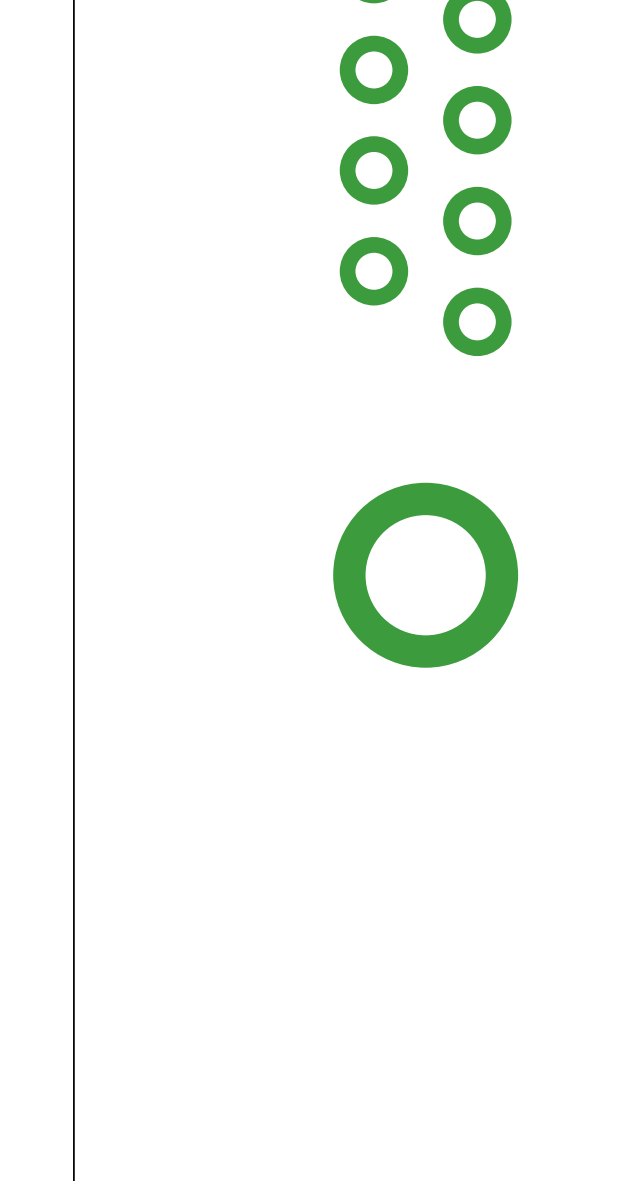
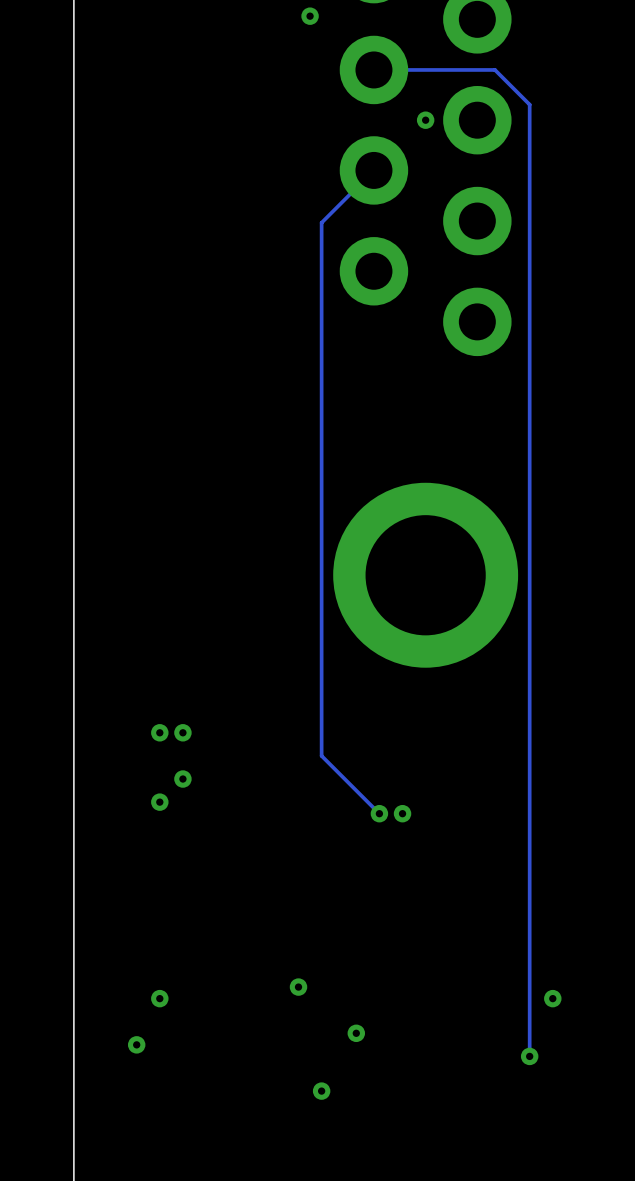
via: none -> (310, 16)
track: none -> (373, 69) (495, 69) (529, 104) (529, 1056)
via: none -> (425, 120)
track: none -> (373, 170) (321, 222) (321, 755) (379, 813)
via: none -> (159, 732)
via: none -> (182, 732)
via: none -> (182, 779)
via: none -> (159, 802)
via: none -> (379, 813)
via: none -> (402, 813)
via: none -> (298, 987)
via: none -> (159, 998)
via: none -> (552, 998)
via: none -> (356, 1033)
via: none -> (136, 1044)
via: none -> (529, 1056)
via: none -> (321, 1091)

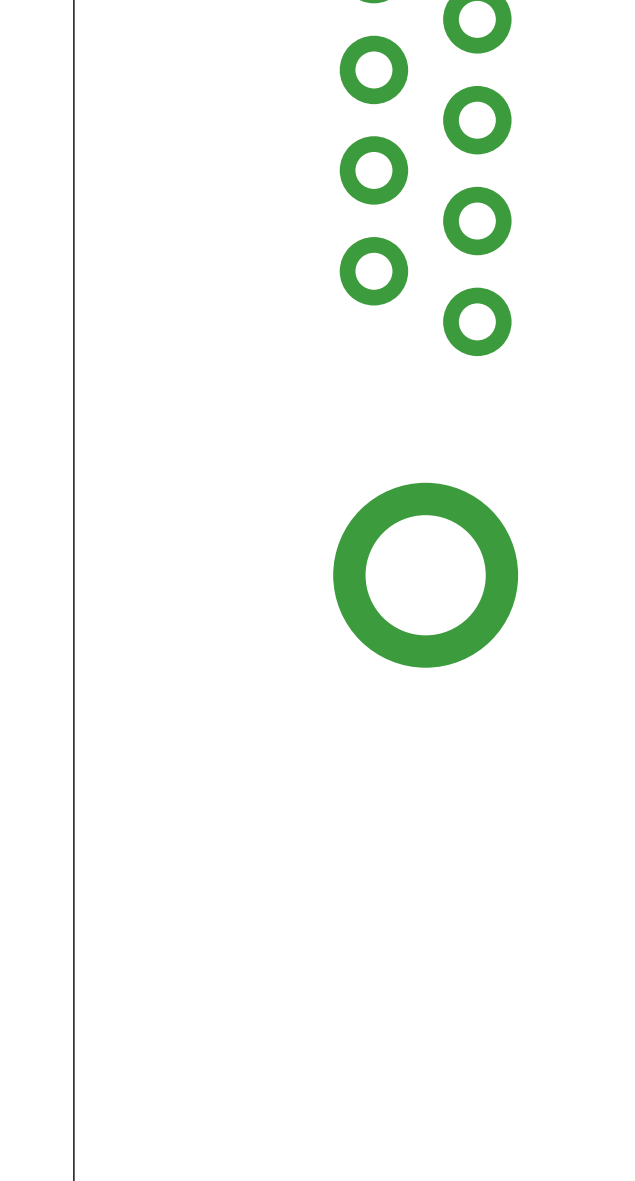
via: (310, 16) -> none
track: (373, 69) (495, 69) (529, 104) (529, 1056) -> none
via: (425, 120) -> none
track: (373, 170) (321, 222) (321, 755) (379, 813) -> none
via: (159, 732) -> none
via: (182, 732) -> none
via: (182, 779) -> none
via: (159, 802) -> none
via: (379, 813) -> none
via: (402, 813) -> none
via: (298, 987) -> none
via: (159, 998) -> none
via: (552, 998) -> none
via: (356, 1033) -> none
via: (136, 1044) -> none
via: (529, 1056) -> none
via: (321, 1091) -> none

